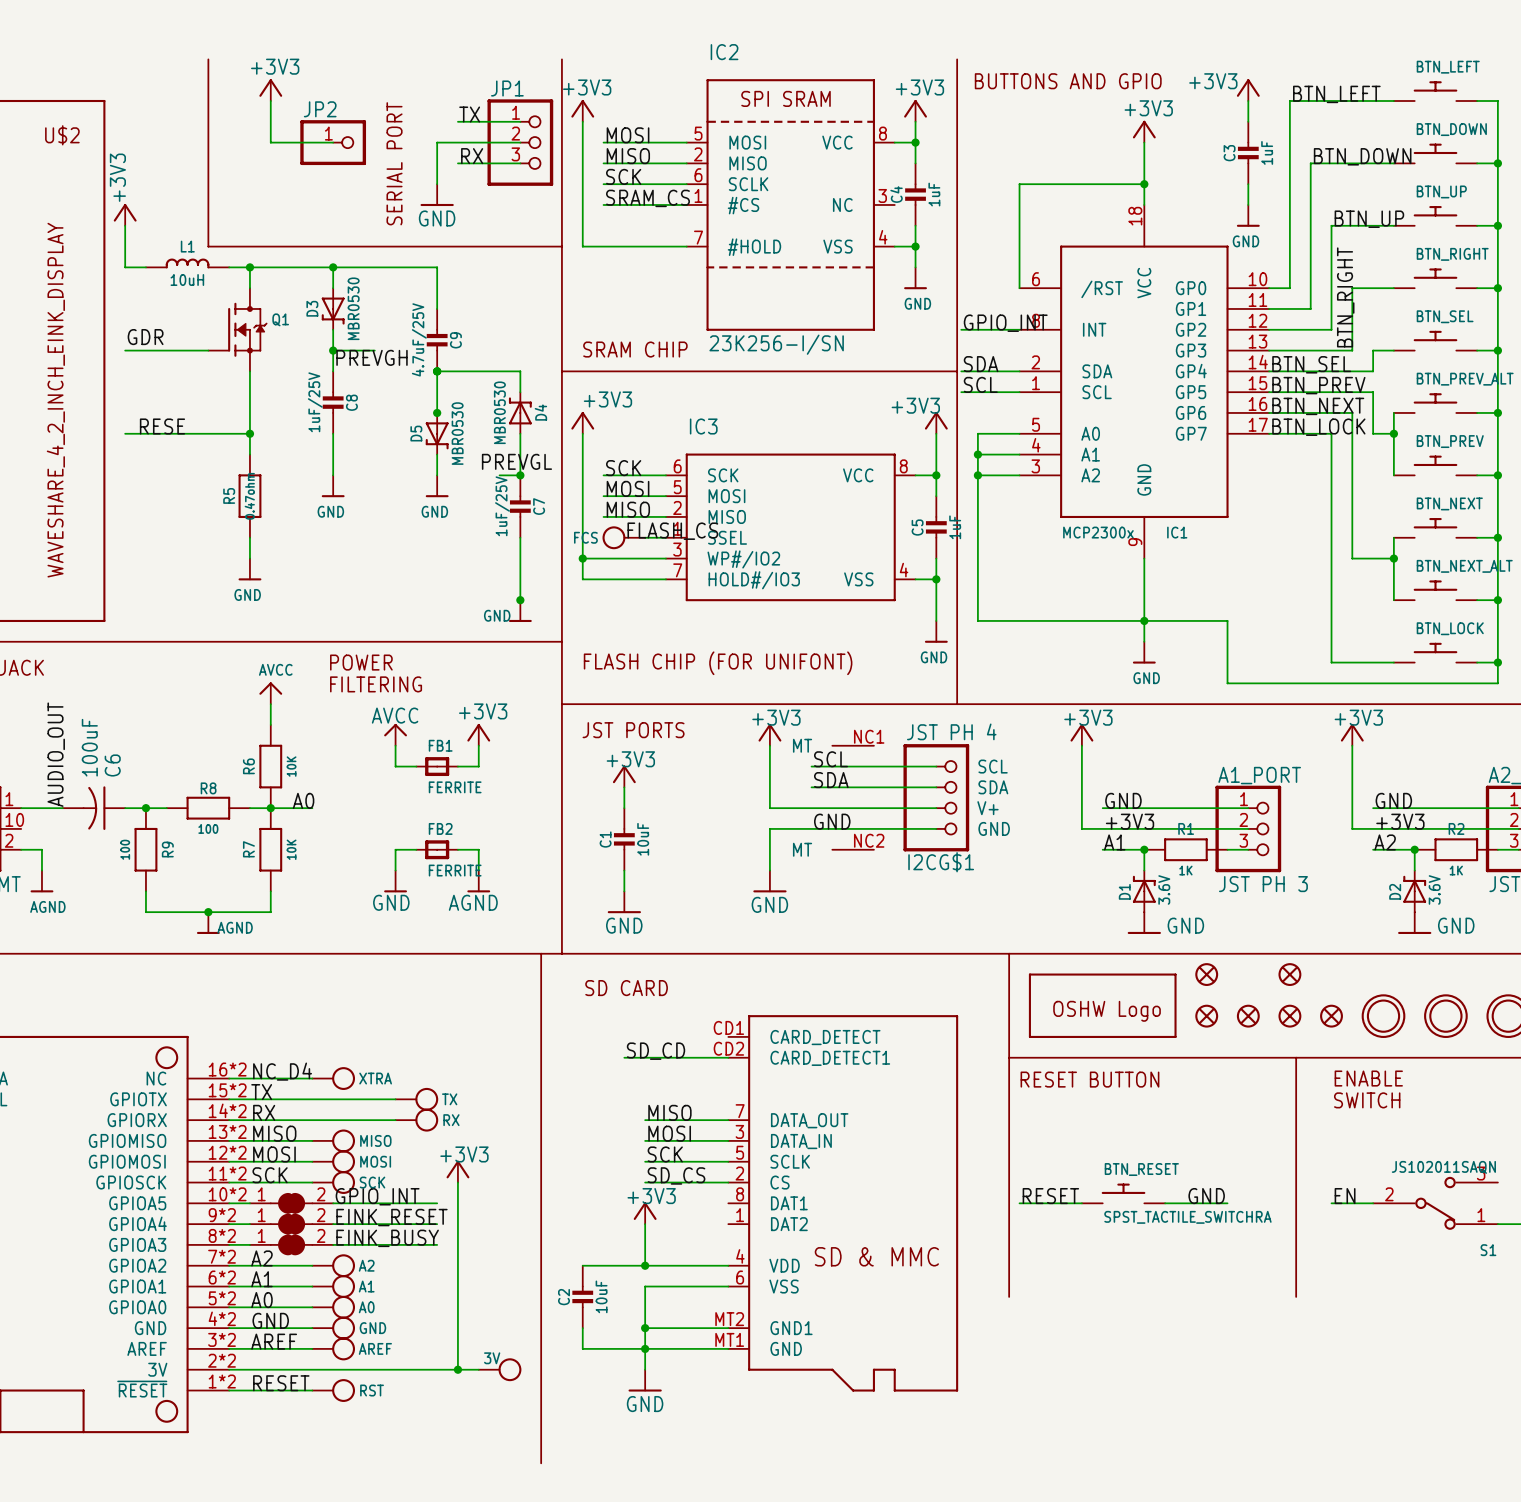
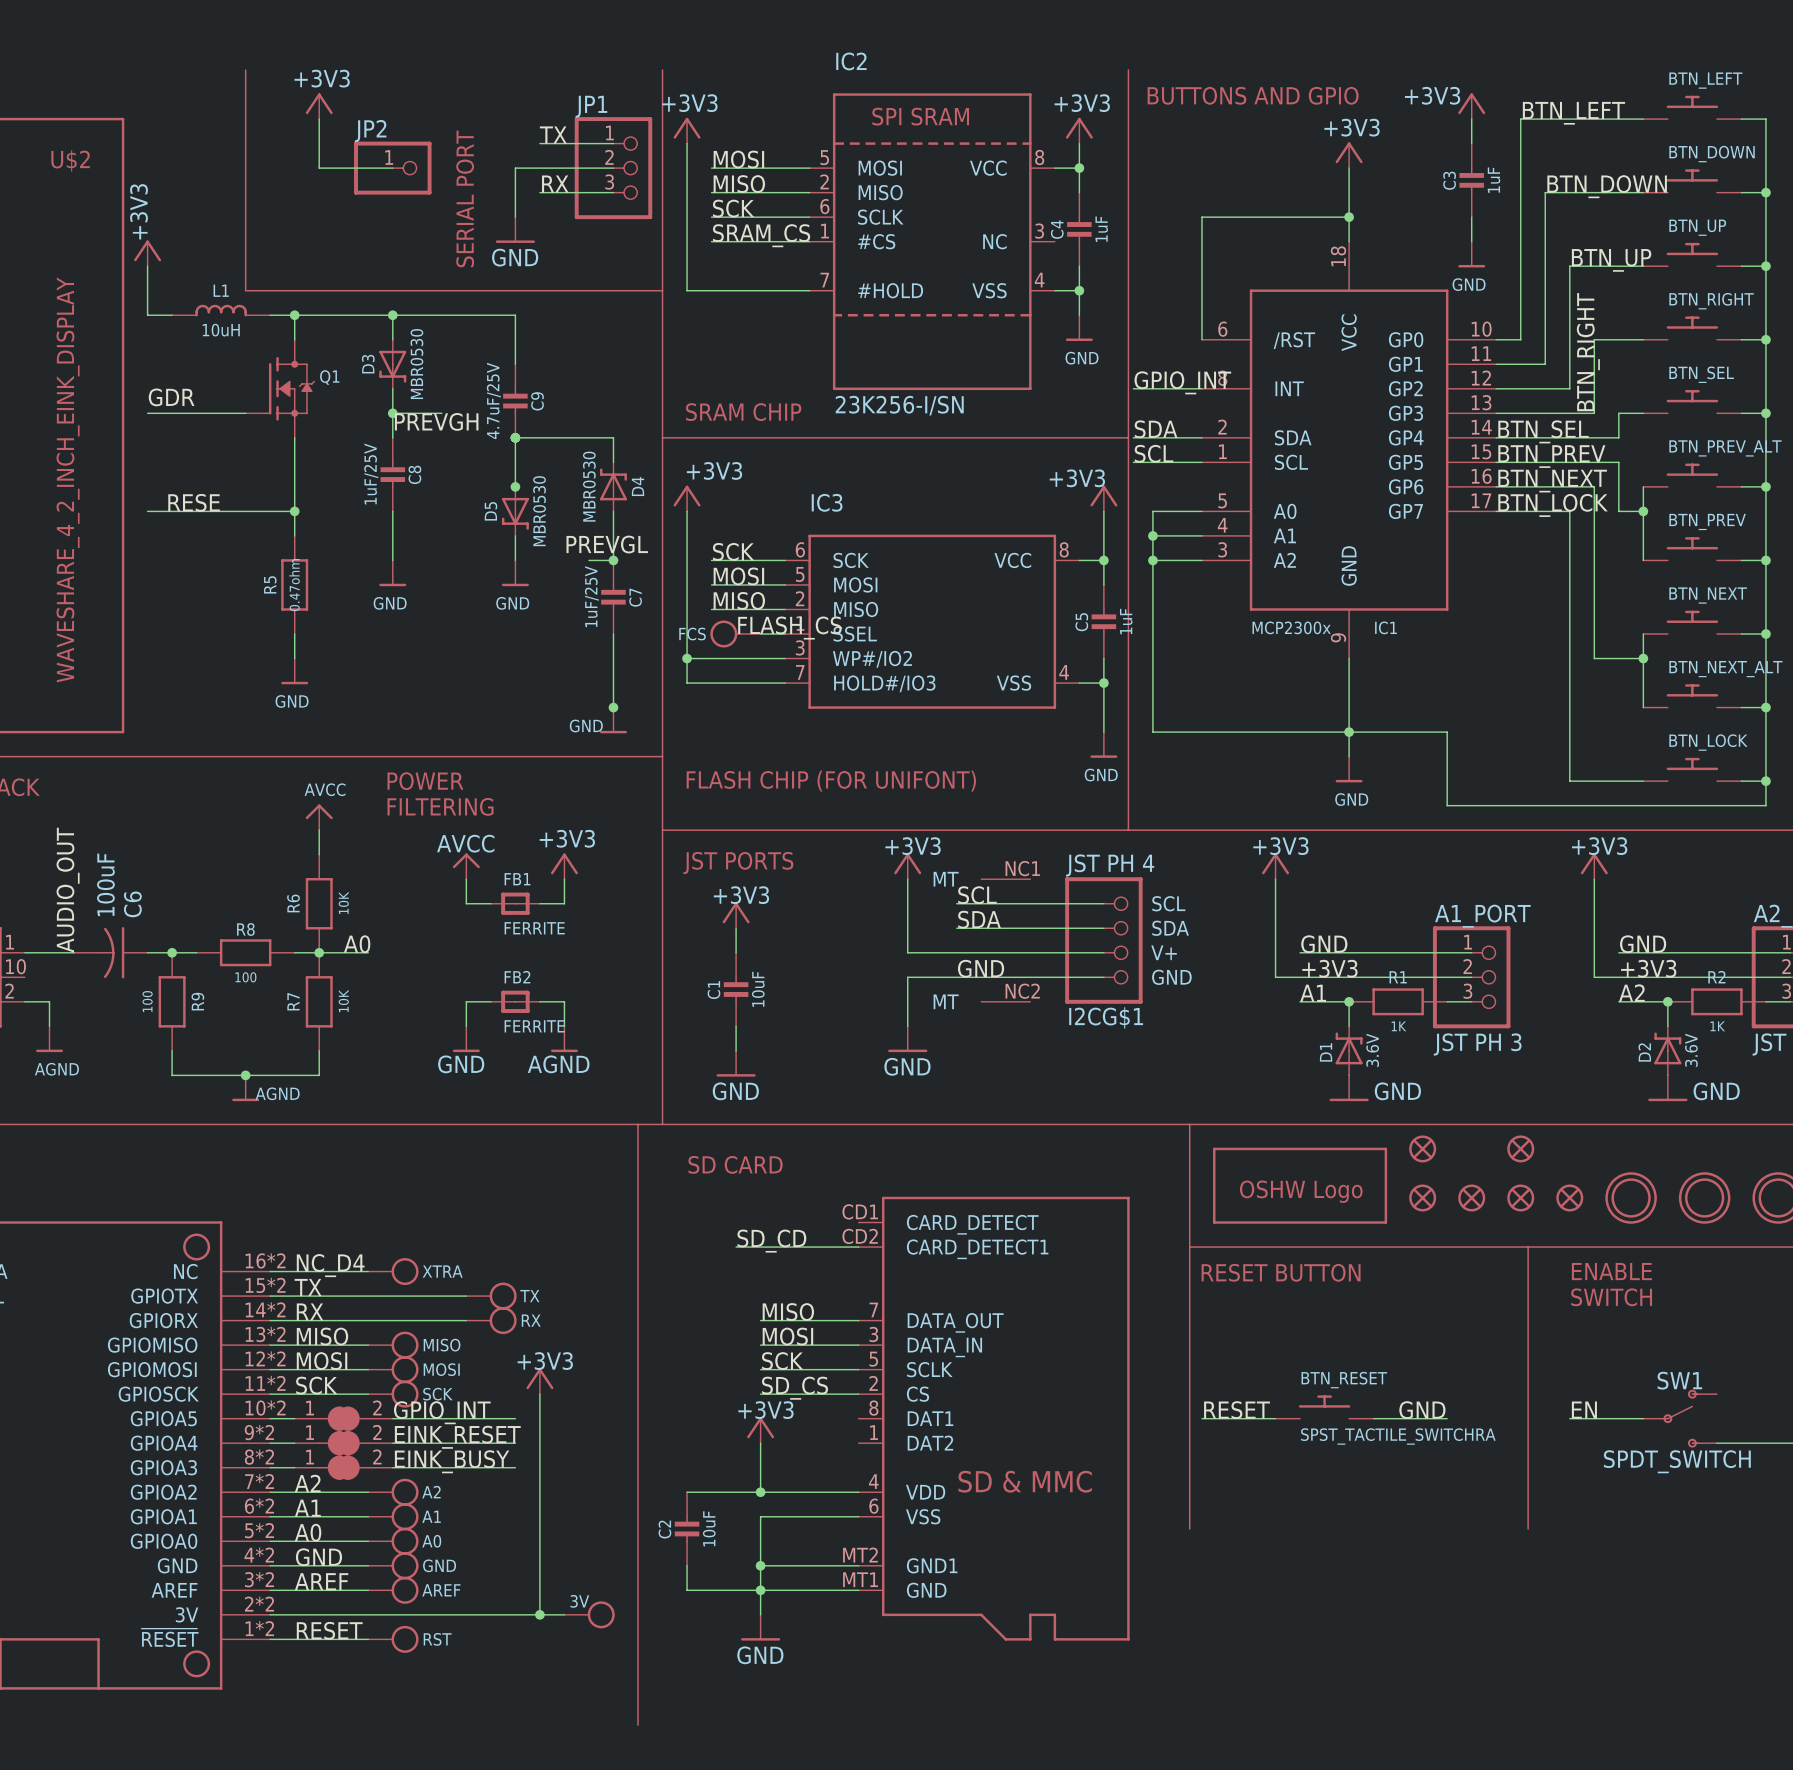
SW1: none -> SPDT_SWITCH (1680, 1418)
S1: JS102011SAQN (1435, 1203) -> none

